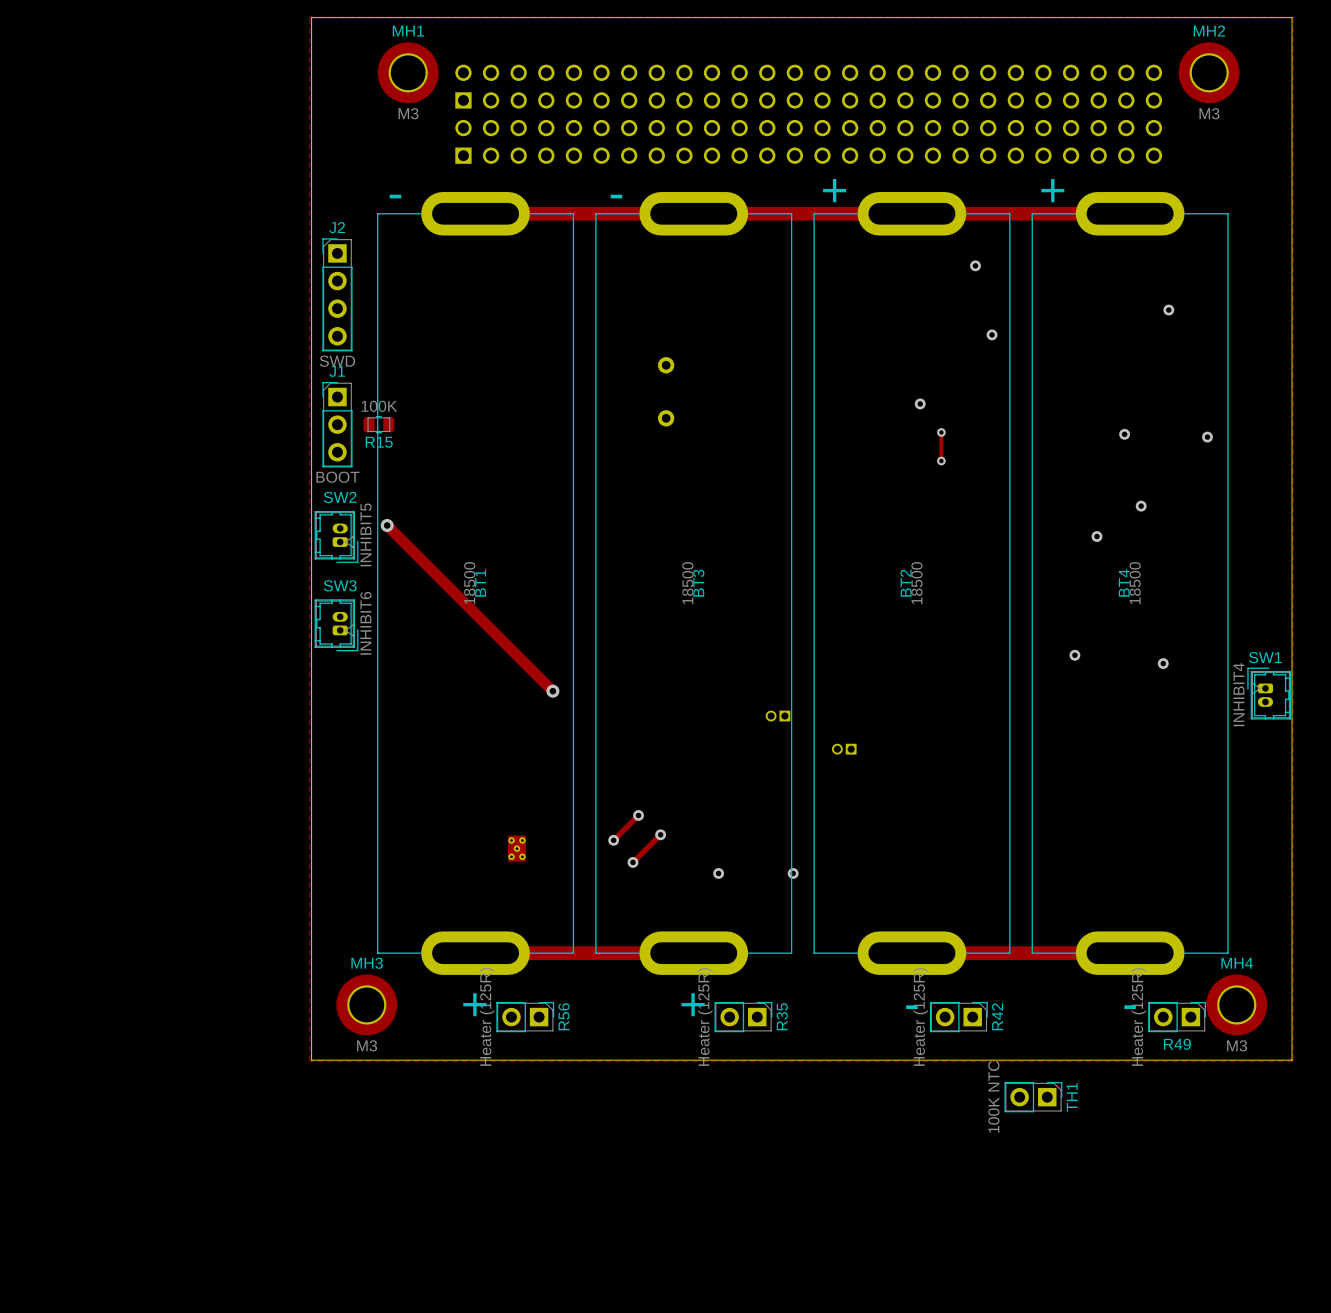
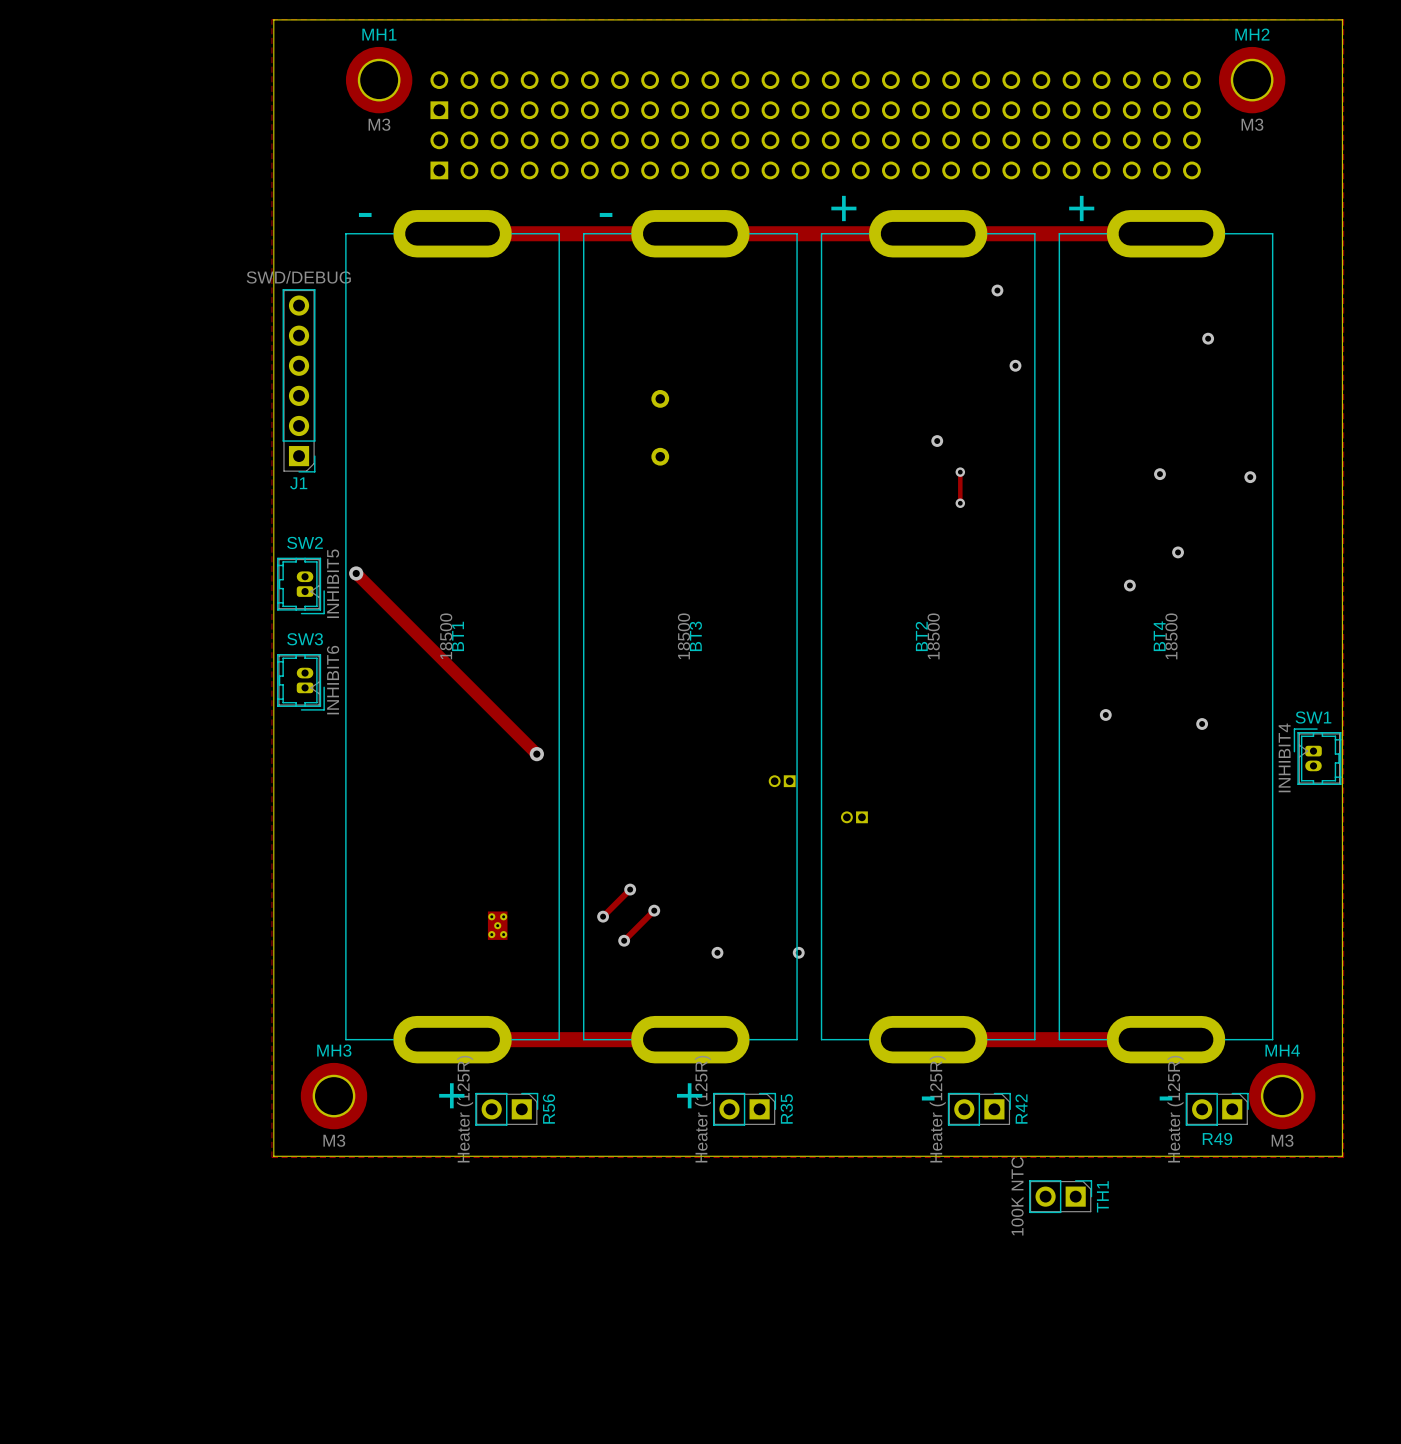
J2: SWD (337, 294) -> none
J1 name position: J1 (337, 371) -> J1 (298, 483)
J1 footprint: [322, 381, 353, 468] -> [282, 289, 316, 473]
R15: 100K (378, 424) -> none
J1 value: BOOT (337, 477) -> SWD/DEBUG (298, 277)

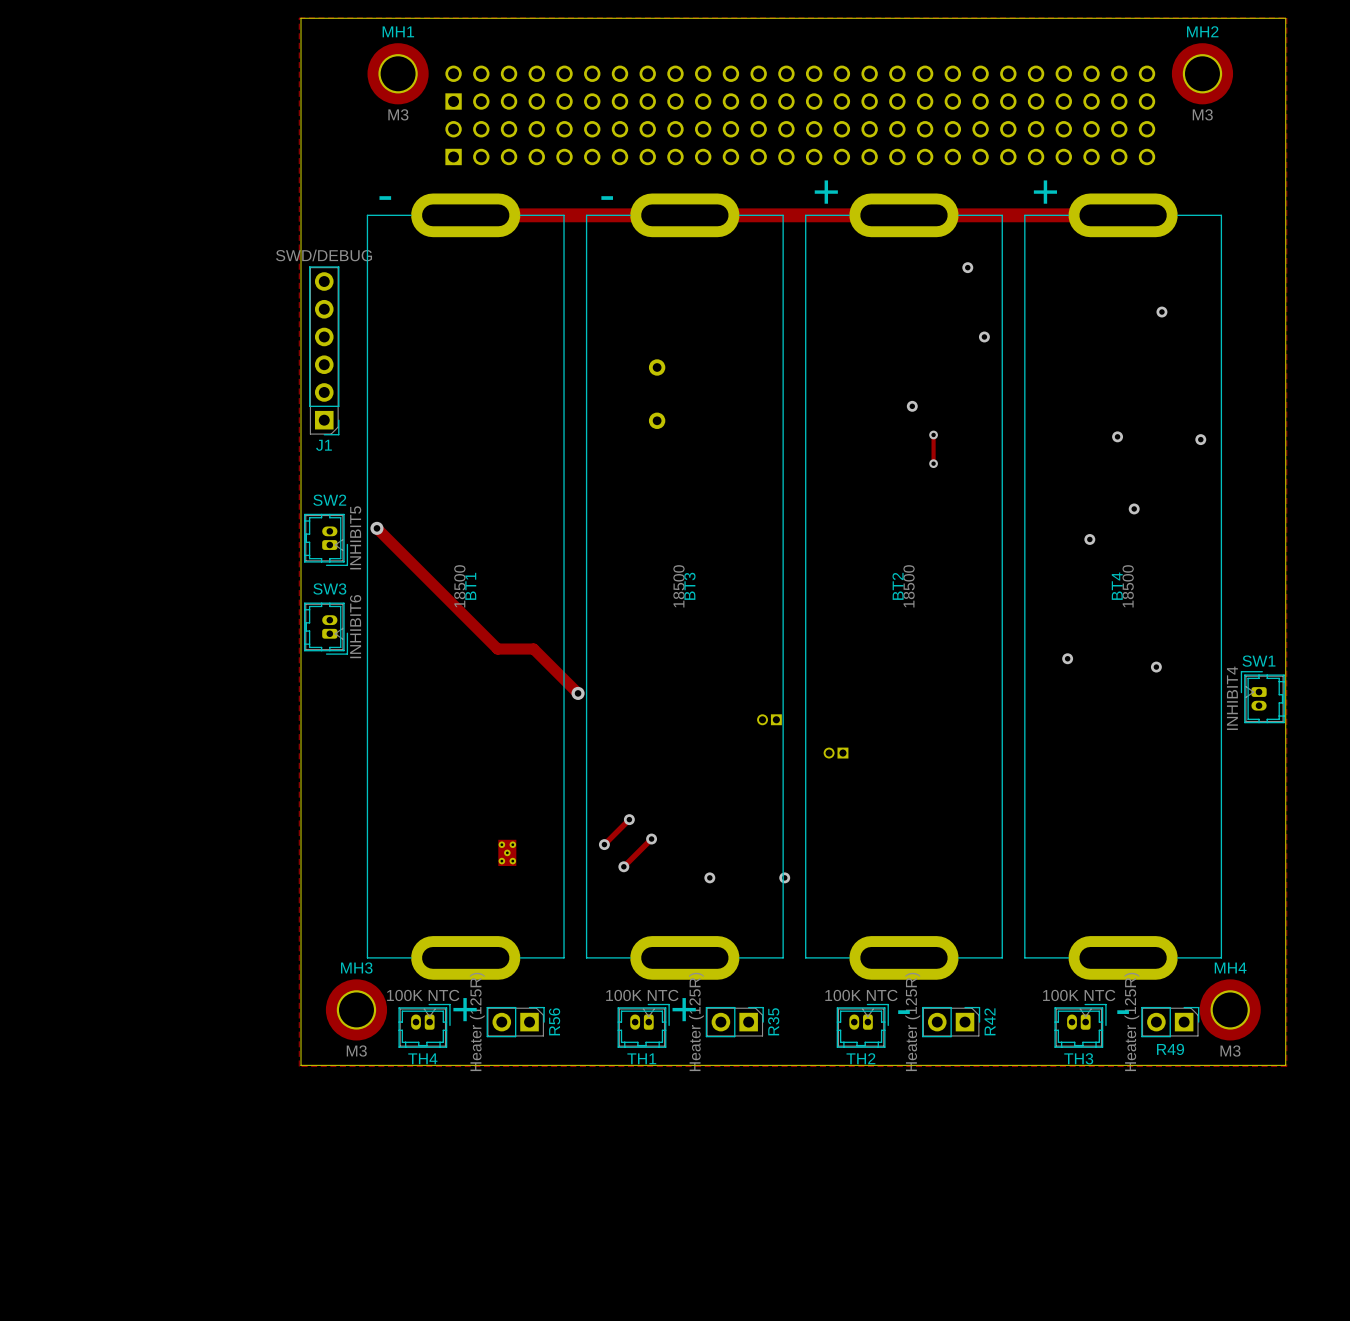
track: (487, 704) (536, 754) -> (497, 649) (533, 649) (578, 693)
via position: (536, 754) -> (578, 693)
track: (452, 1039) (690, 1039) -> none
track: (928, 1039) (1166, 1039) -> none
TH4: none -> 100K NTC (424, 1025)
TH2: none -> 100K NTC (862, 1025)
TH3: none -> 100K NTC (1080, 1025)
TH1 footprint: [1029, 1180, 1093, 1214] -> [617, 1003, 670, 1048]
TH1 value position: 100K NTC (1017, 1196) -> 100K NTC (642, 995)
TH1 name position: TH1 (1102, 1196) -> TH1 (641, 1058)

